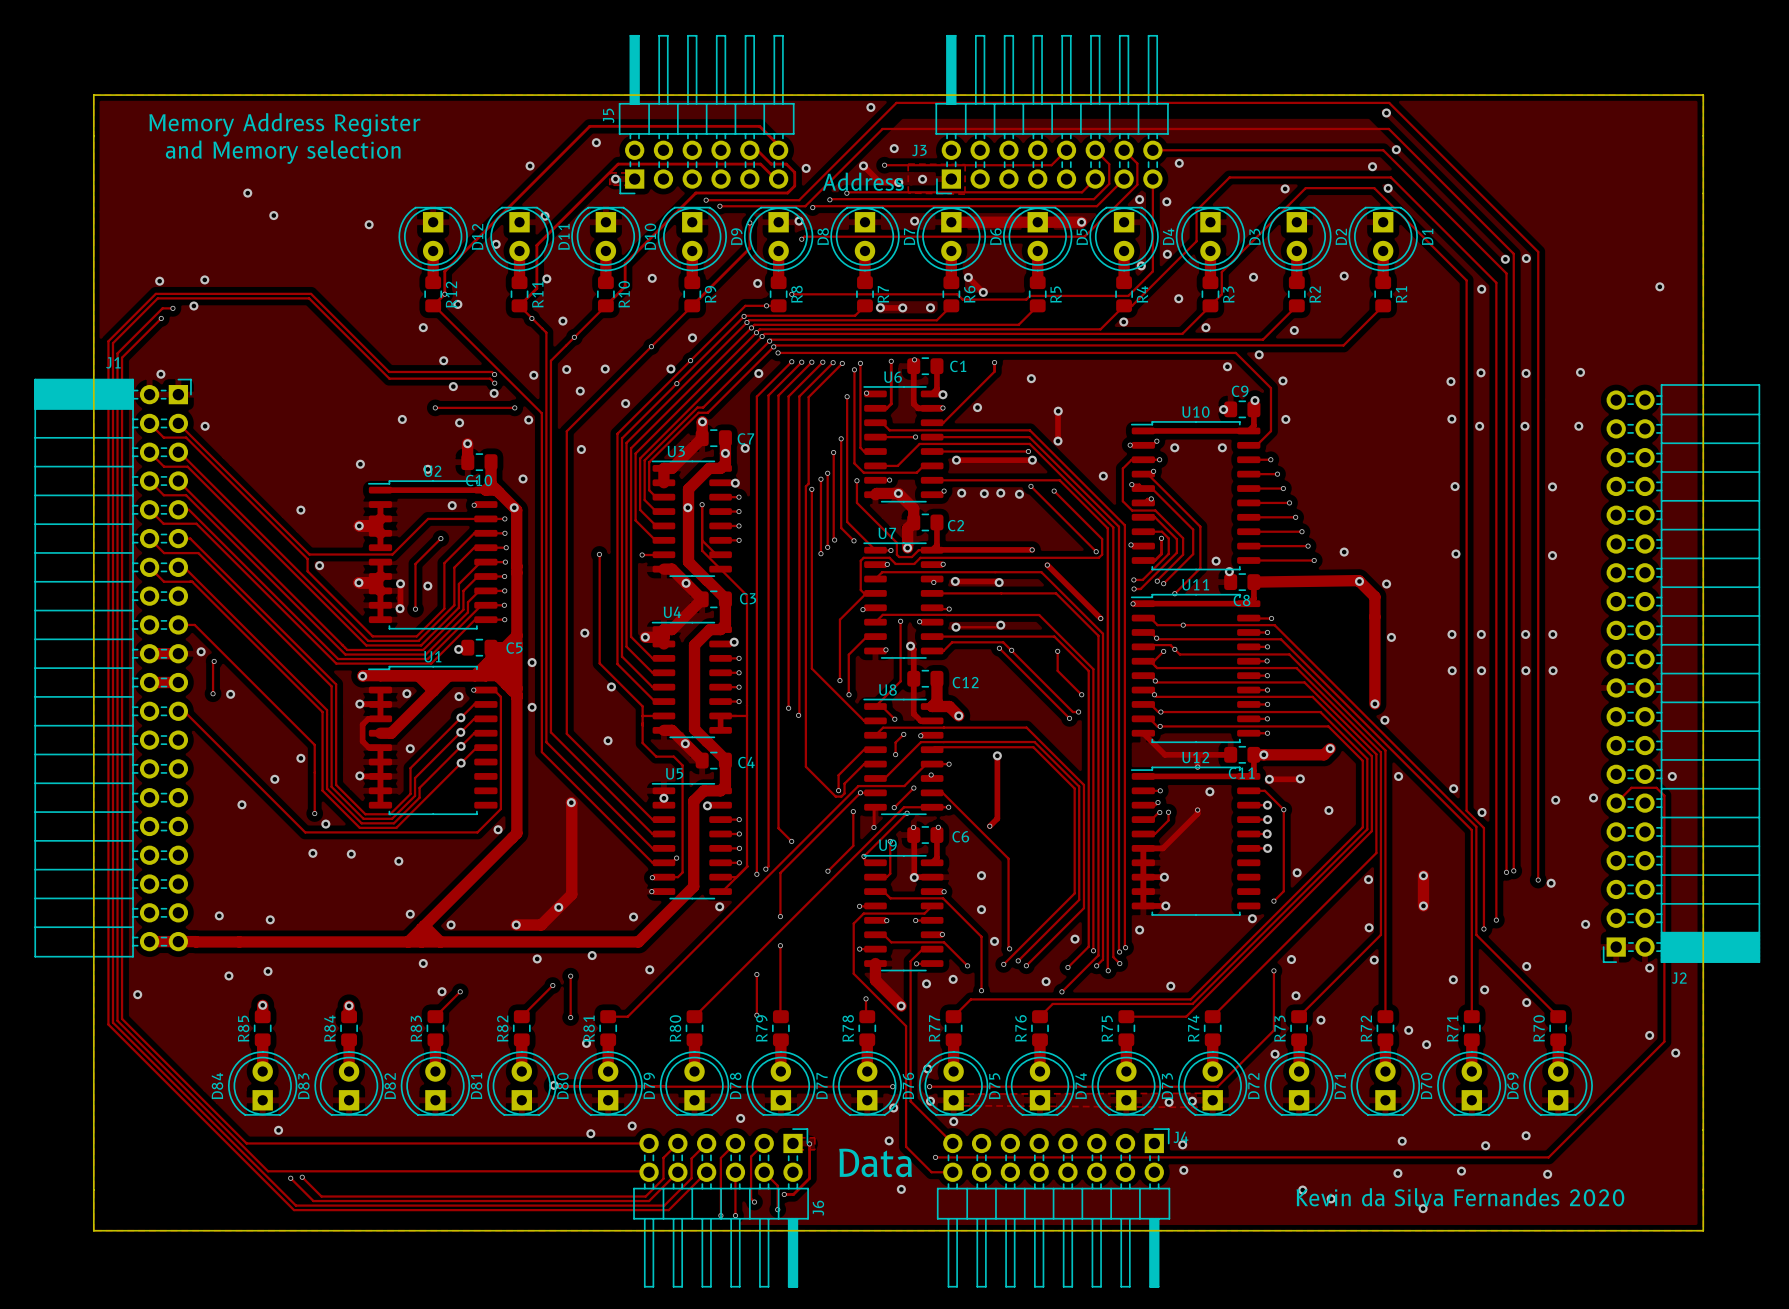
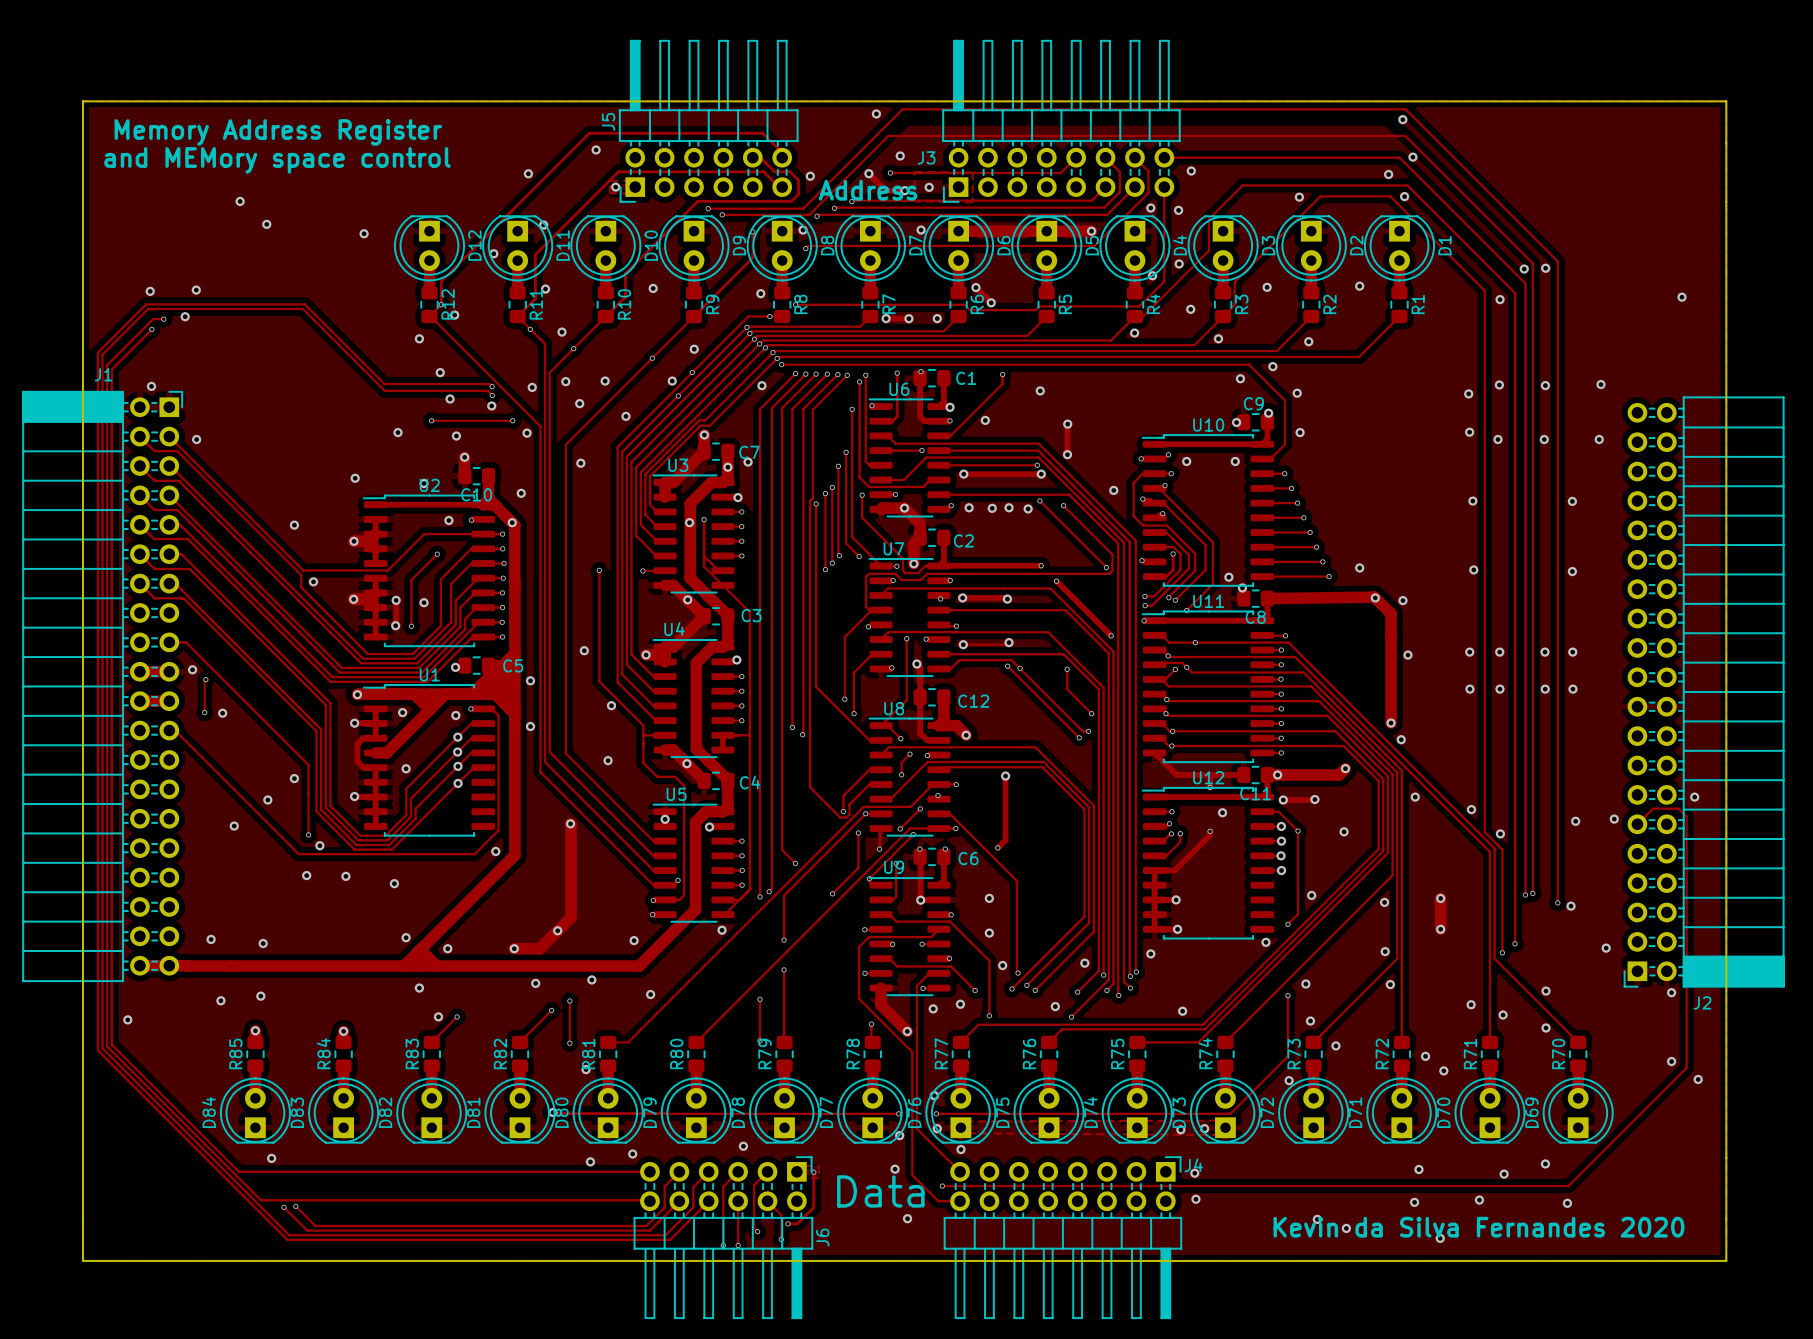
text: and Memory selection (283, 152) -> and MEMory space control (277, 160)

